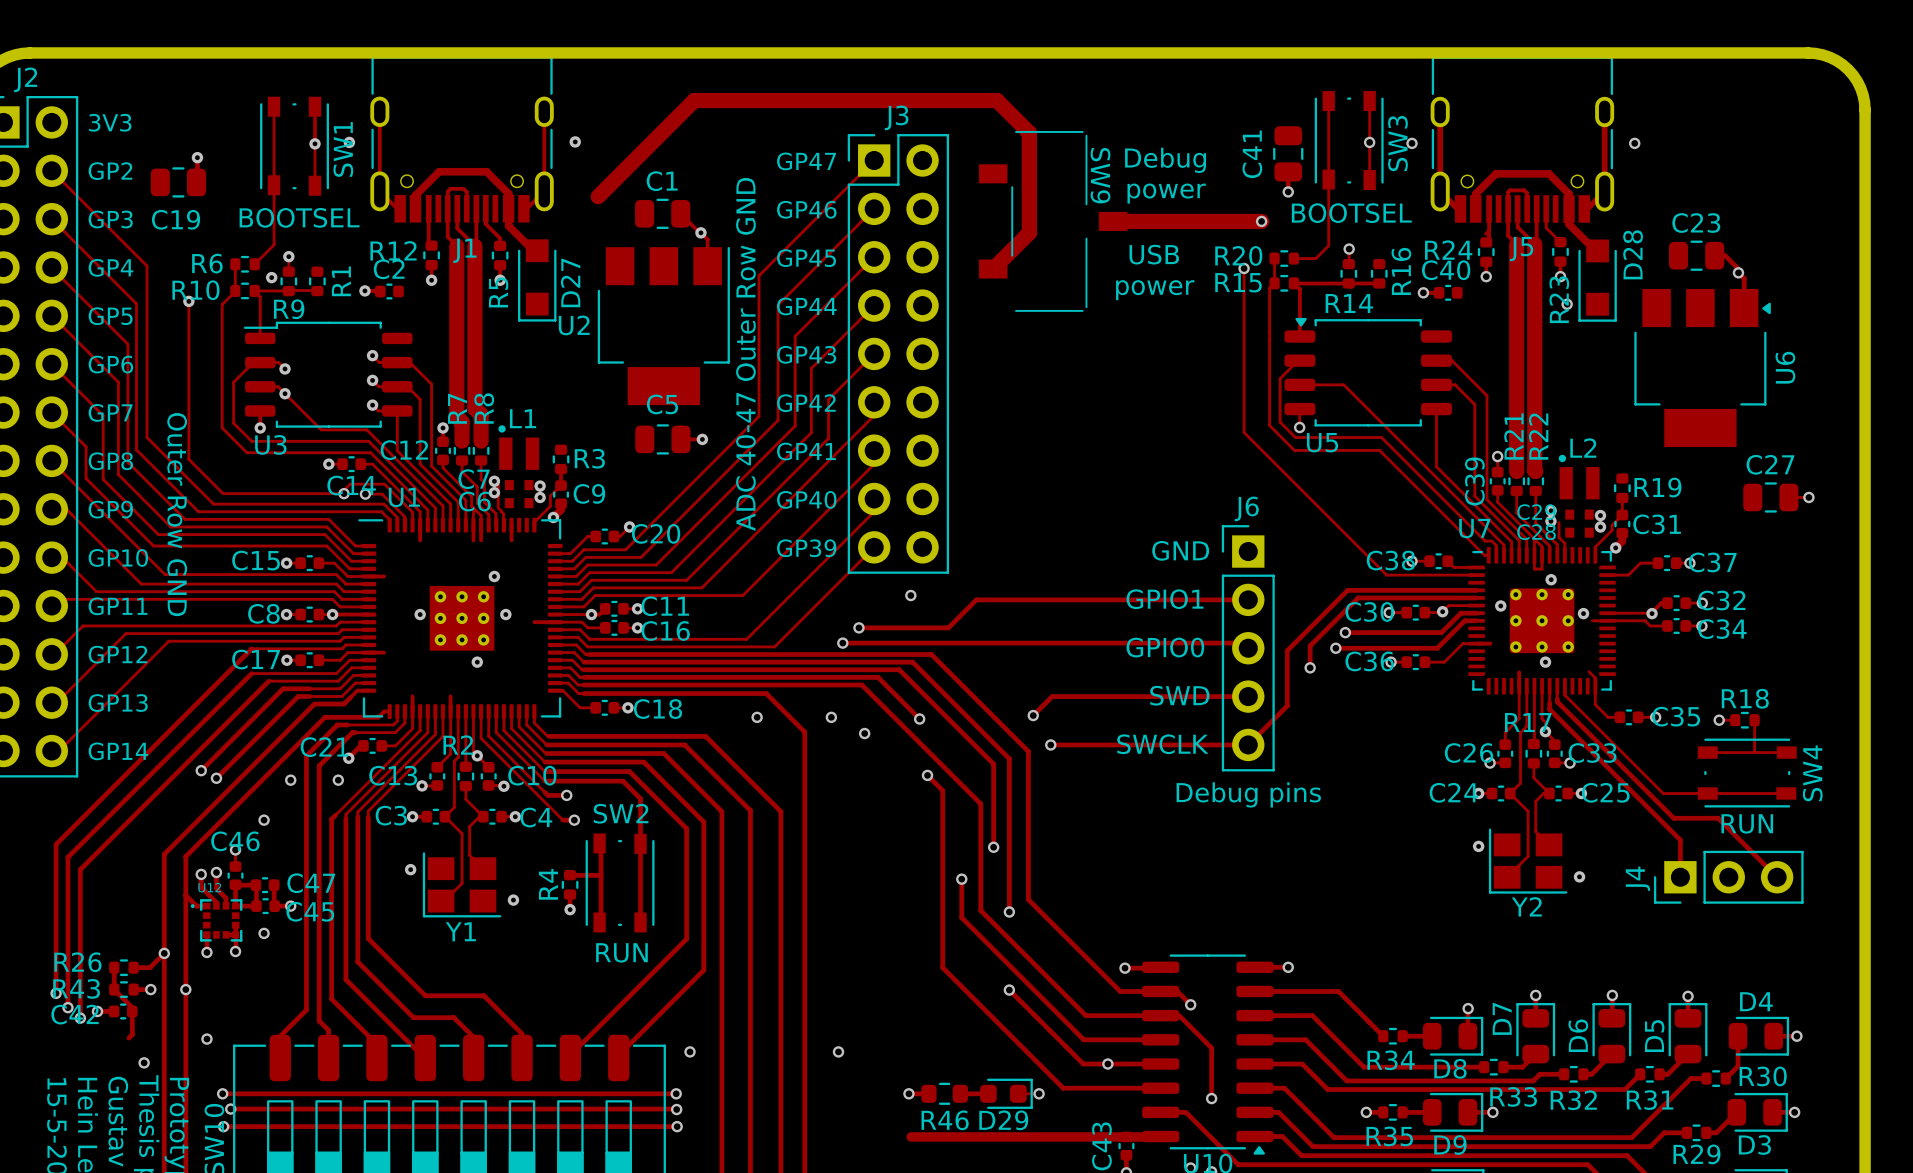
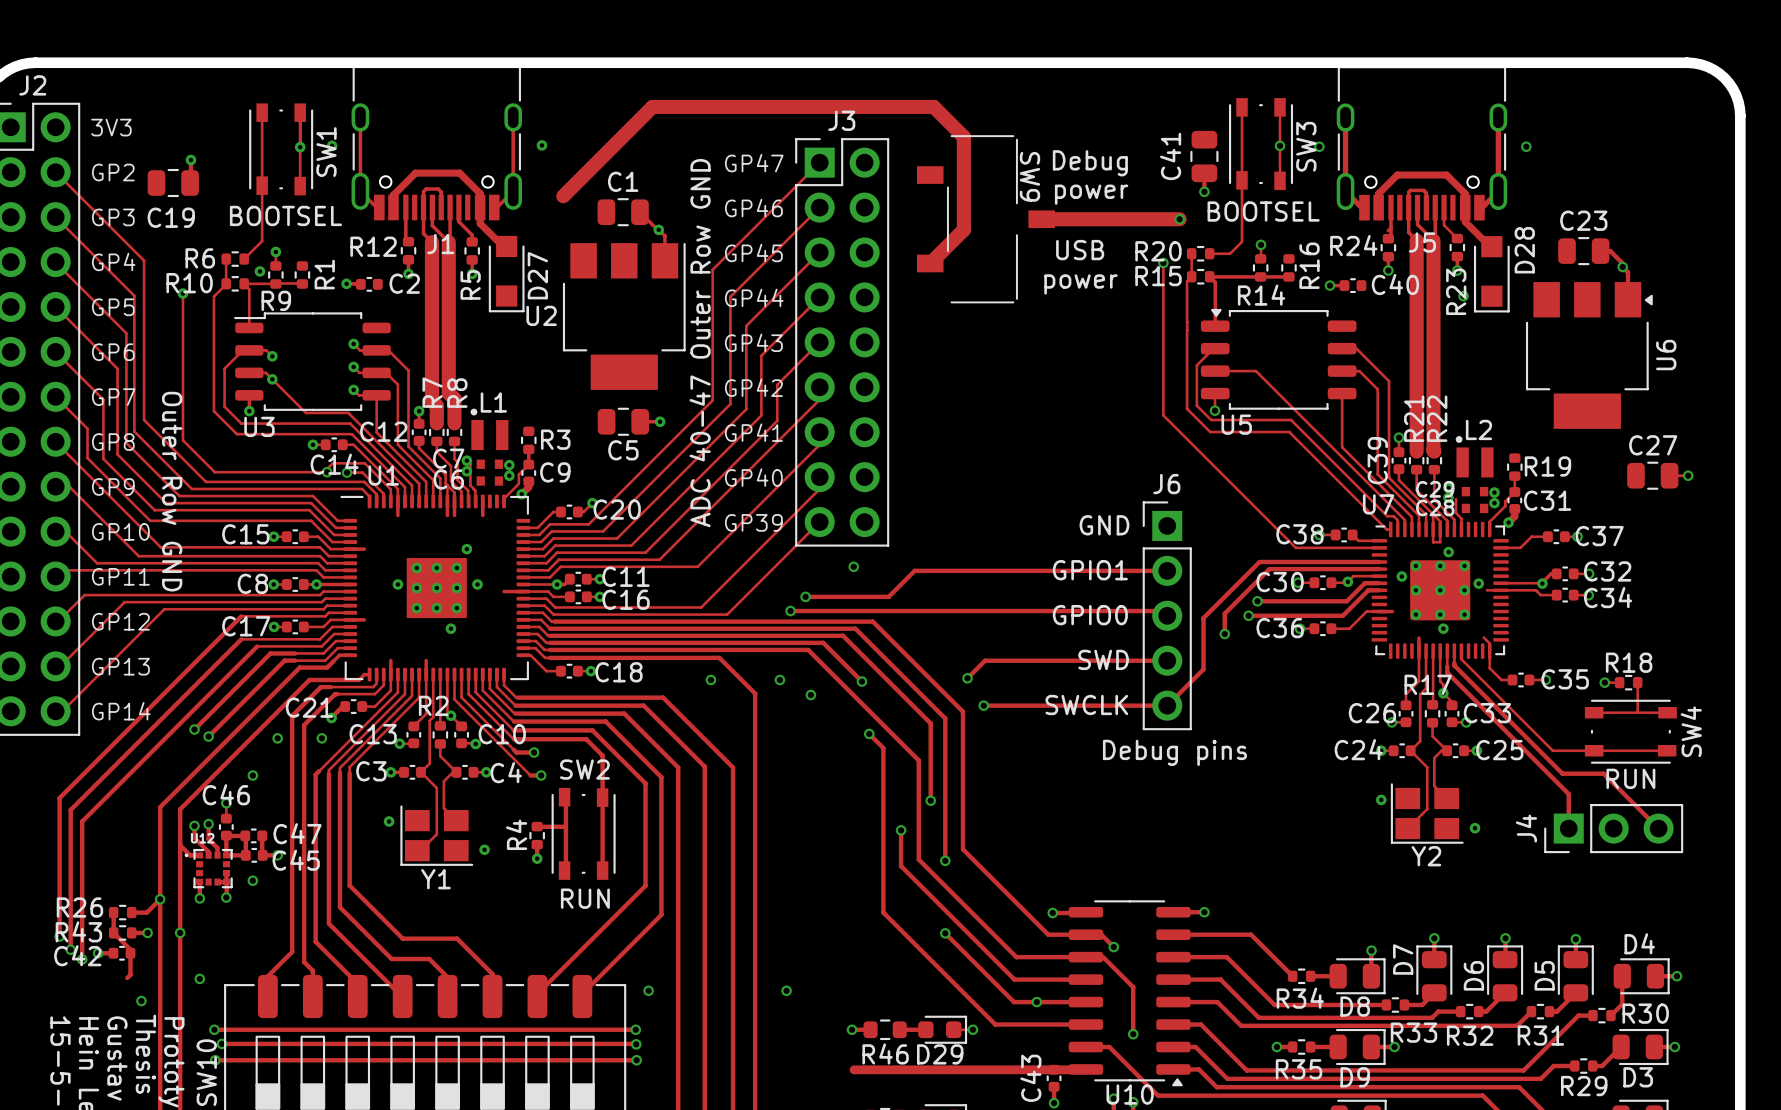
C2 name position: C2 (389, 269) -> C2 (404, 283)
C40 name position: C40 (1446, 270) -> C40 (1395, 284)
C5 name position: C5 (662, 404) -> C5 (623, 450)

